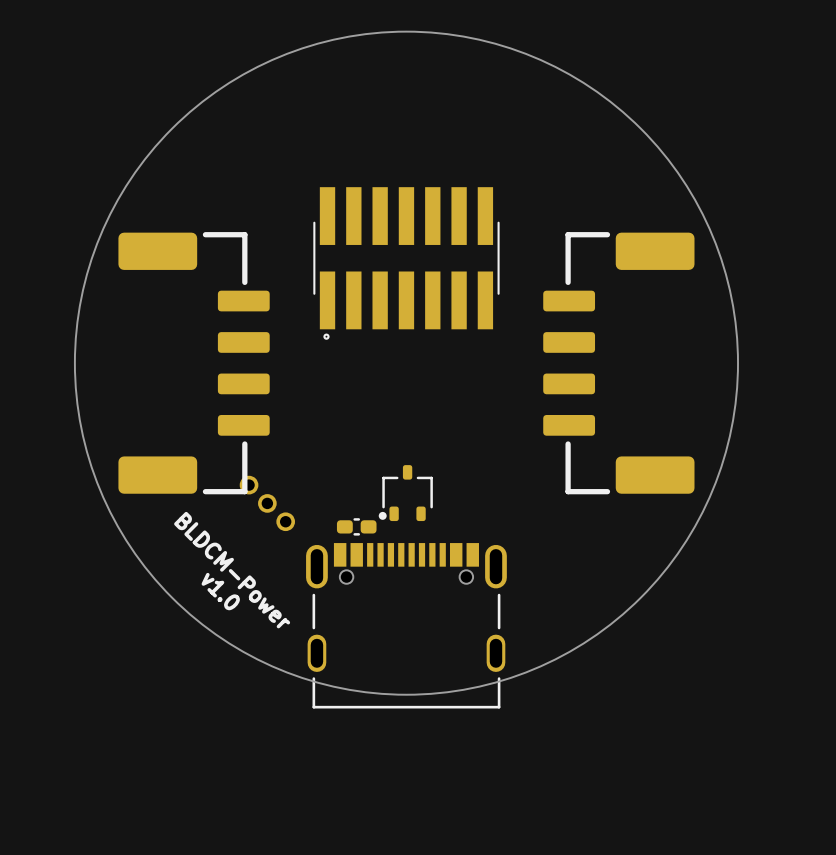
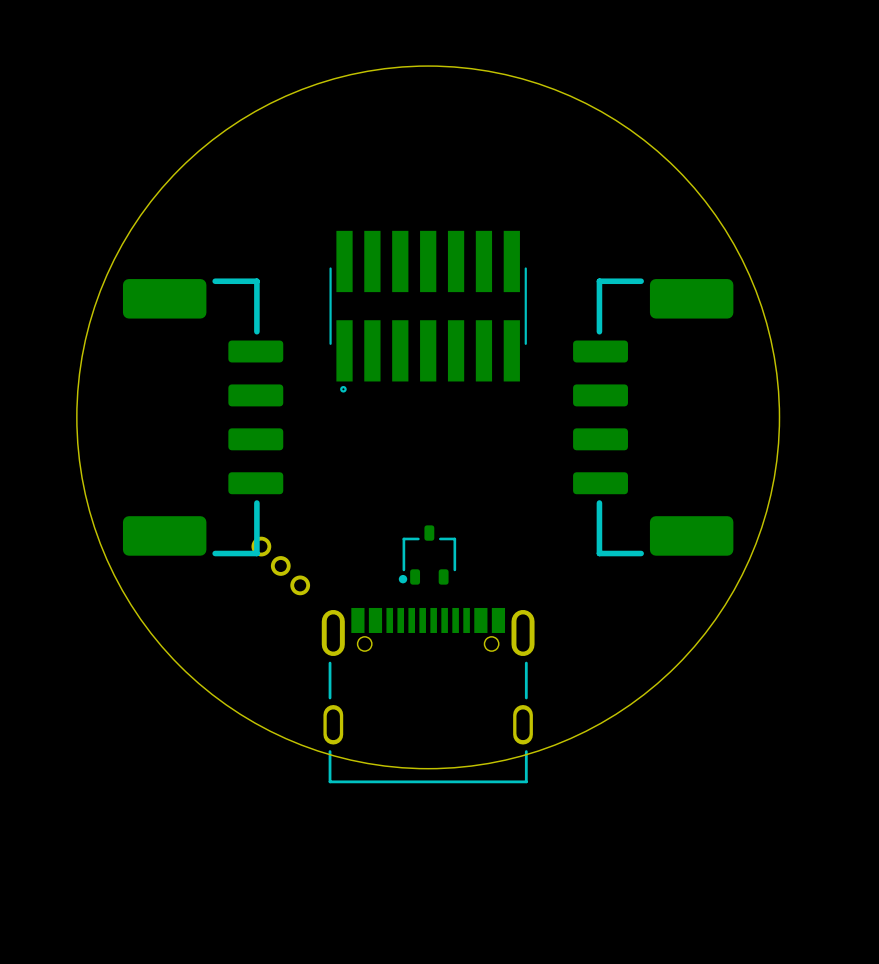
part: (356, 526) -> none
text: BLDCM-Power (232, 570) -> none
text: v1.0 (220, 591) -> none

